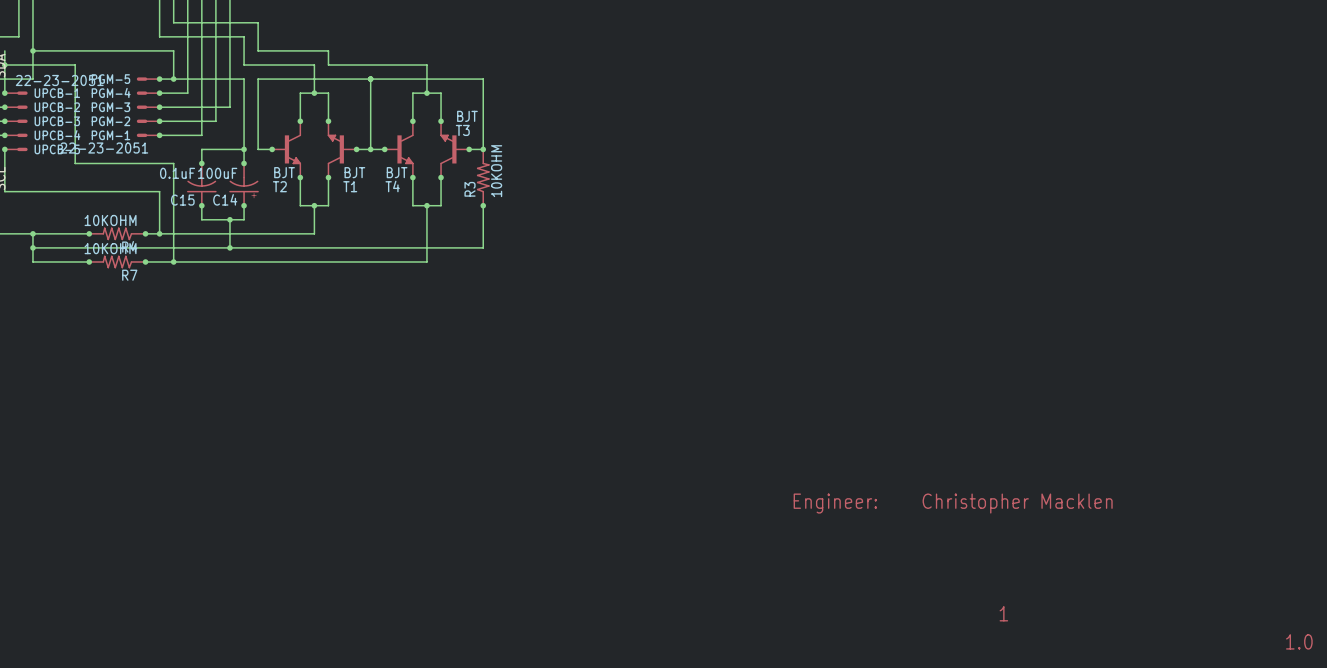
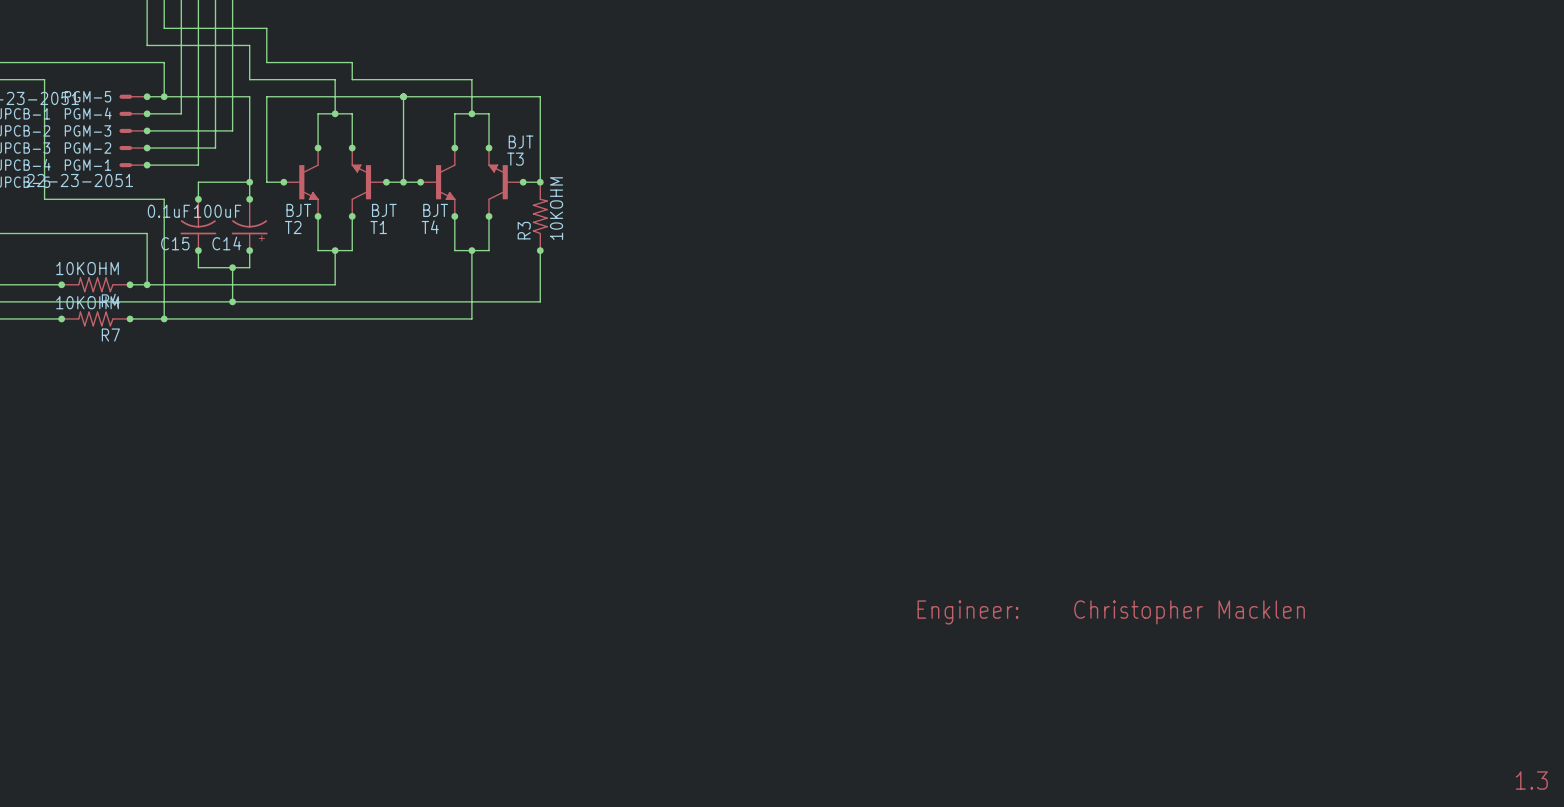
text: 1 (1003, 613) -> none
text: 1.0 (1299, 641) -> 1.3 (1531, 780)

